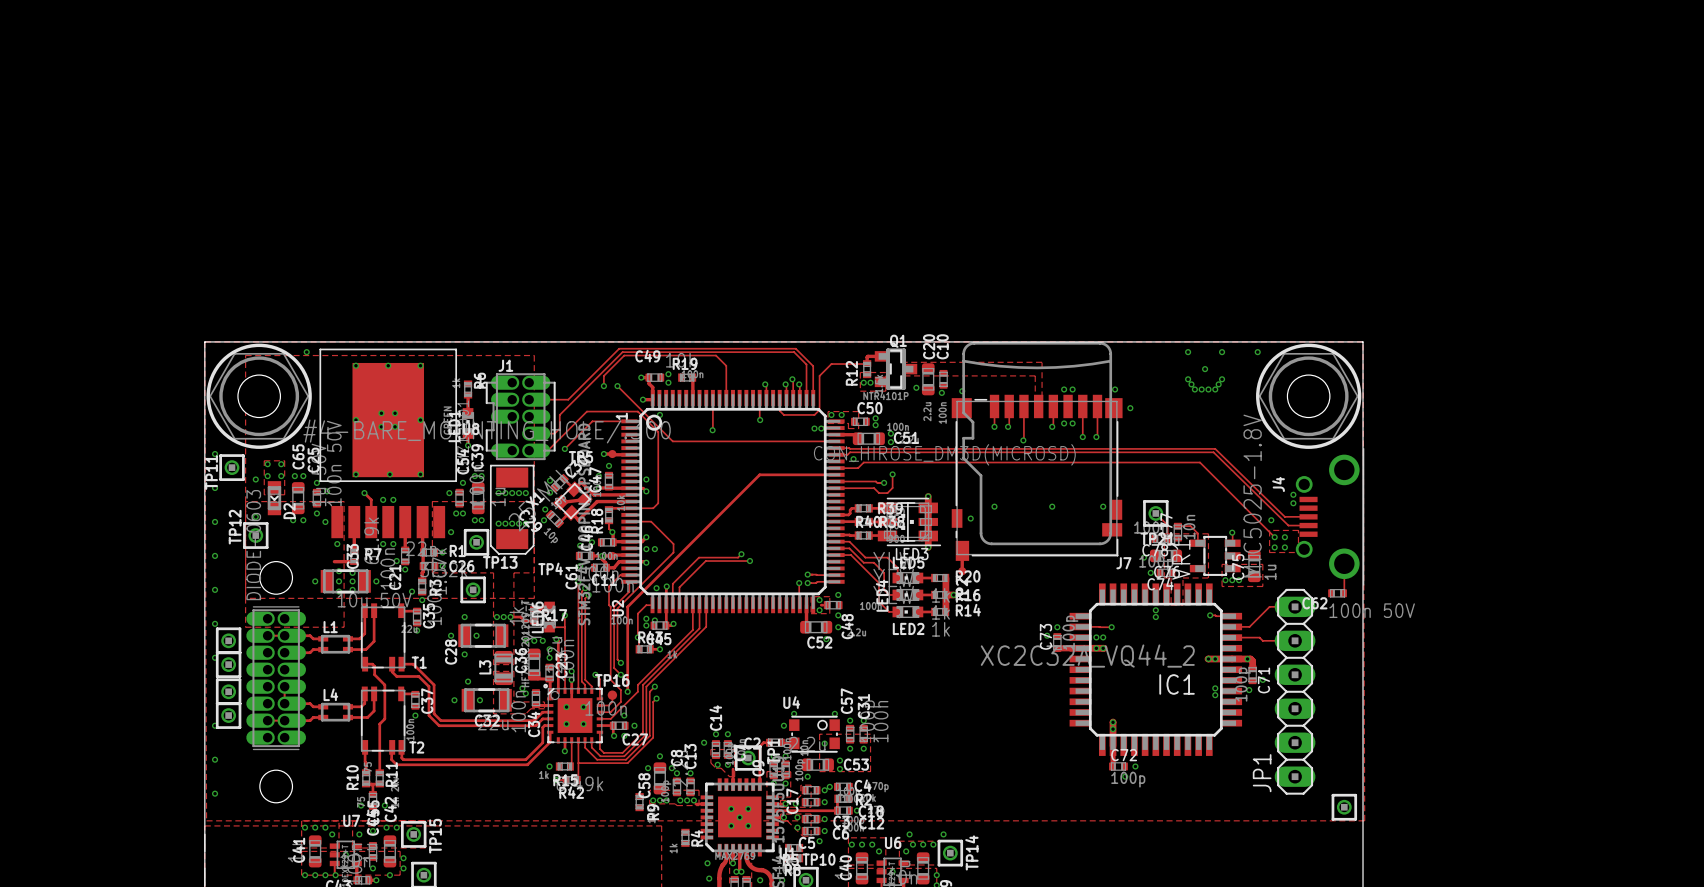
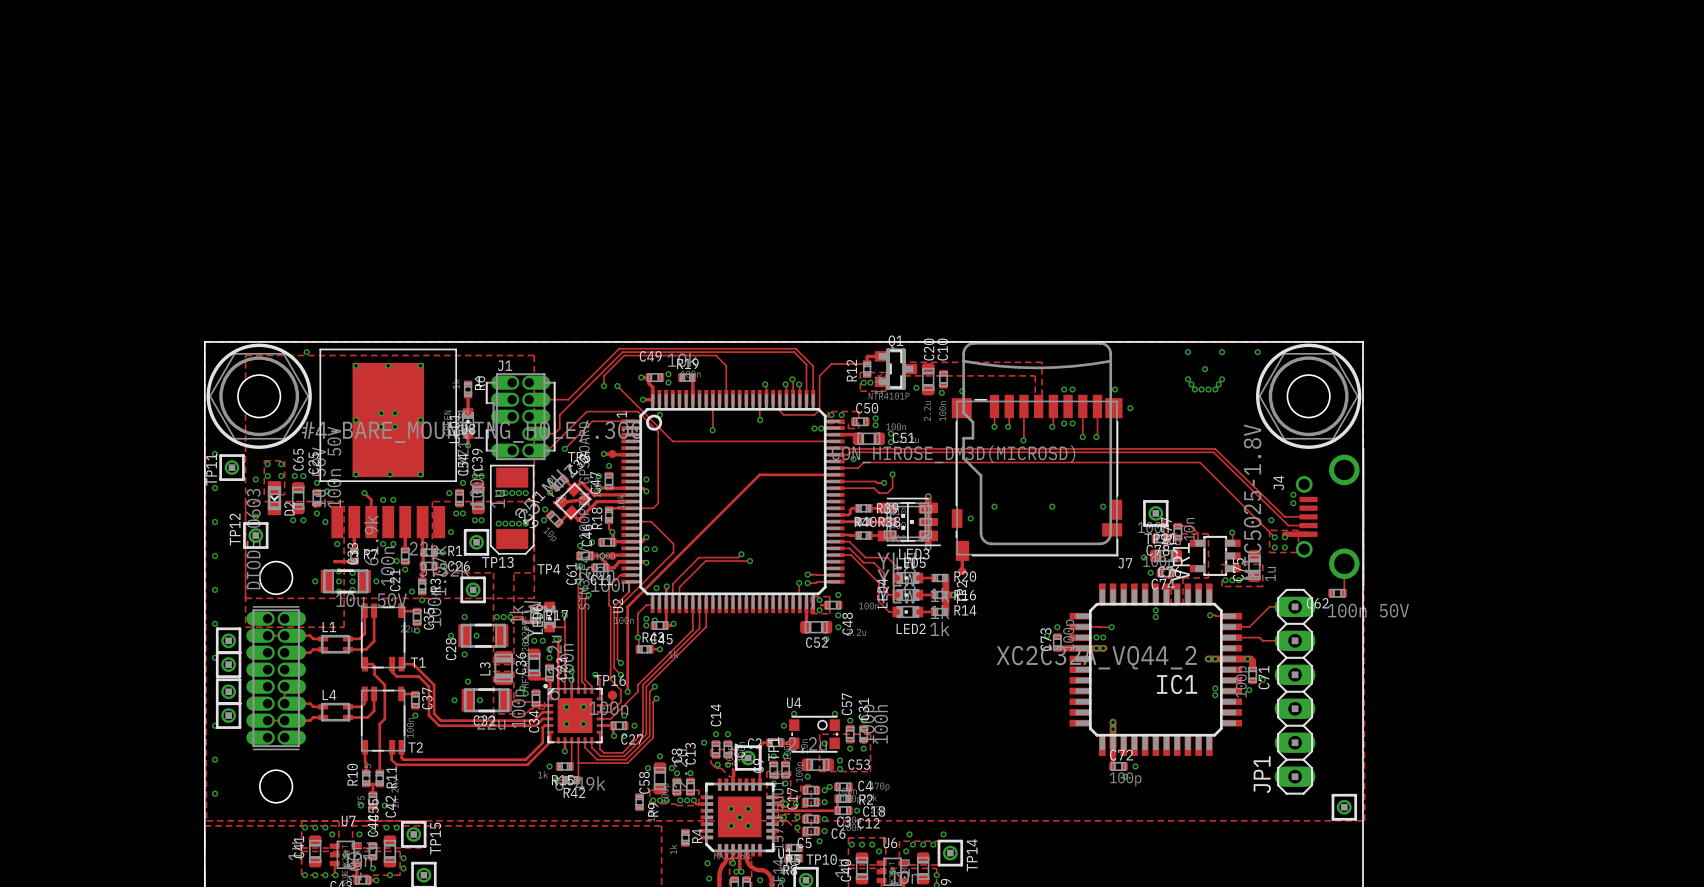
track: none -> (1308, 534) (1284, 534) (1284, 537)

